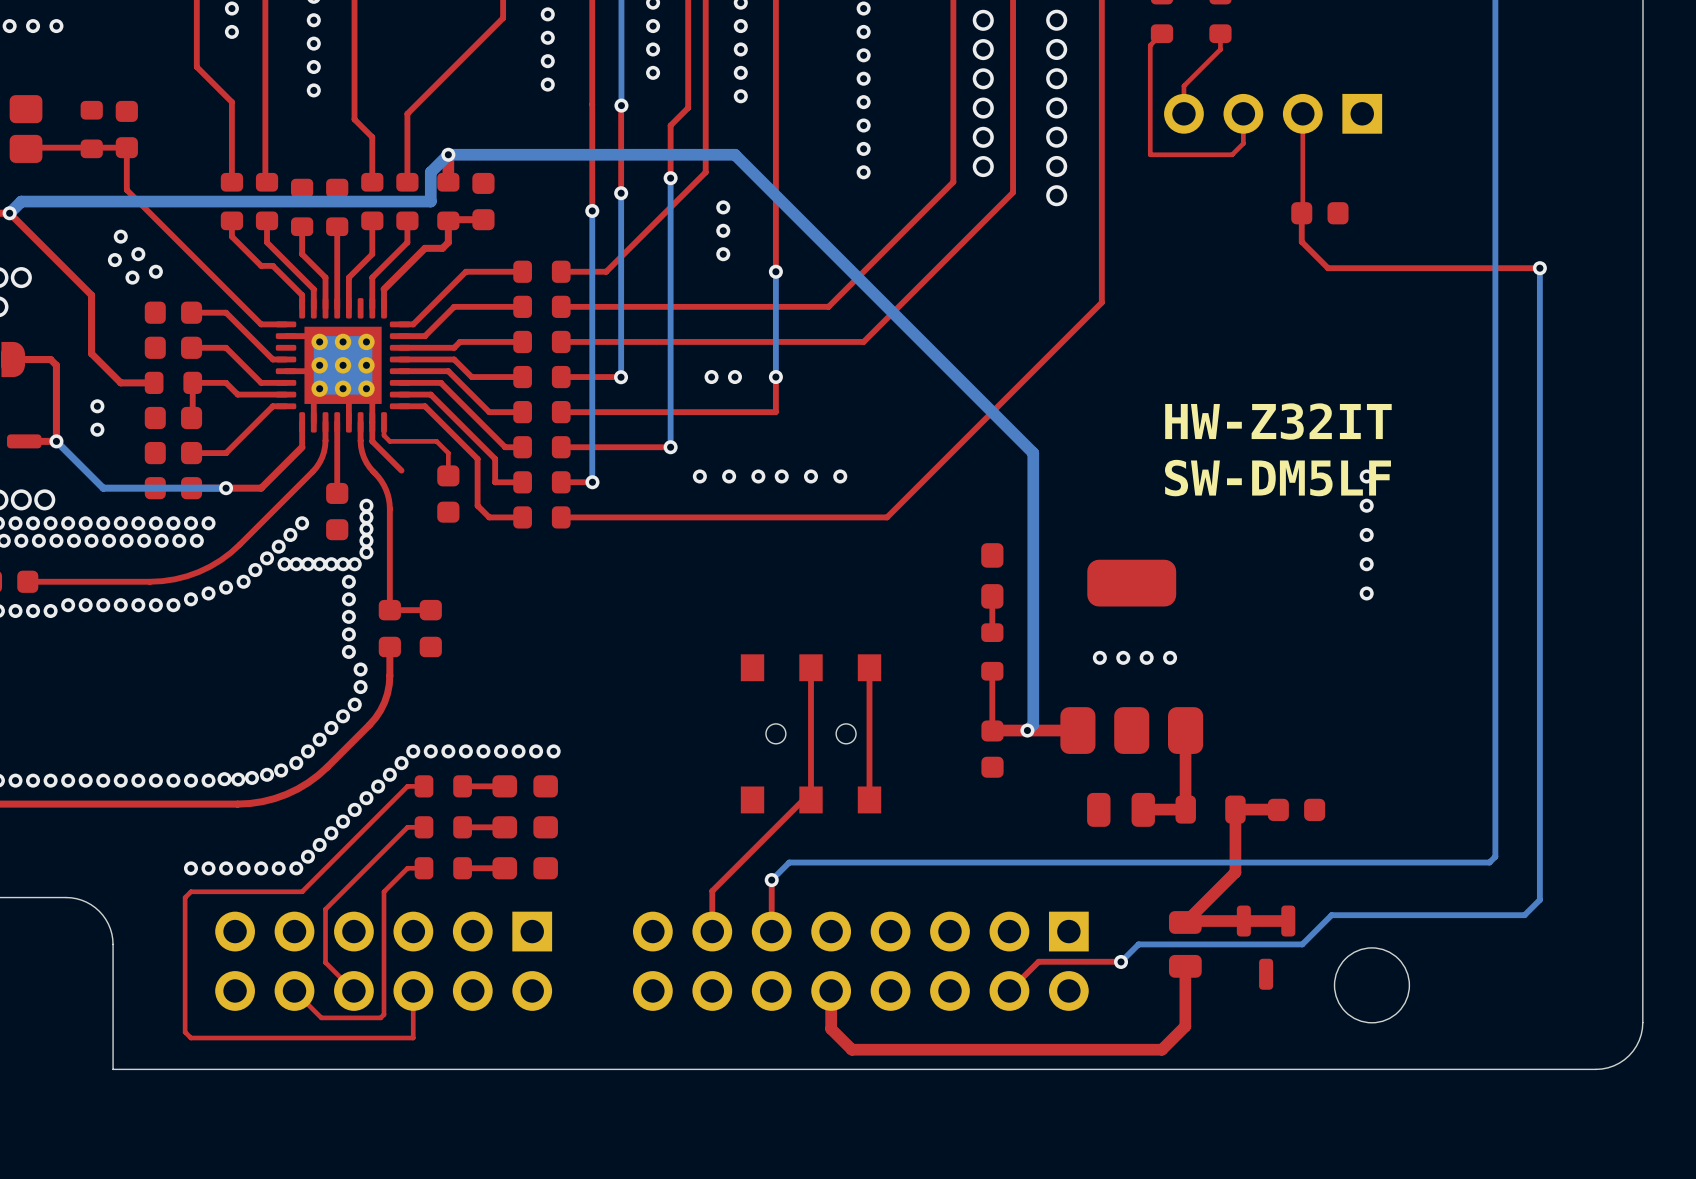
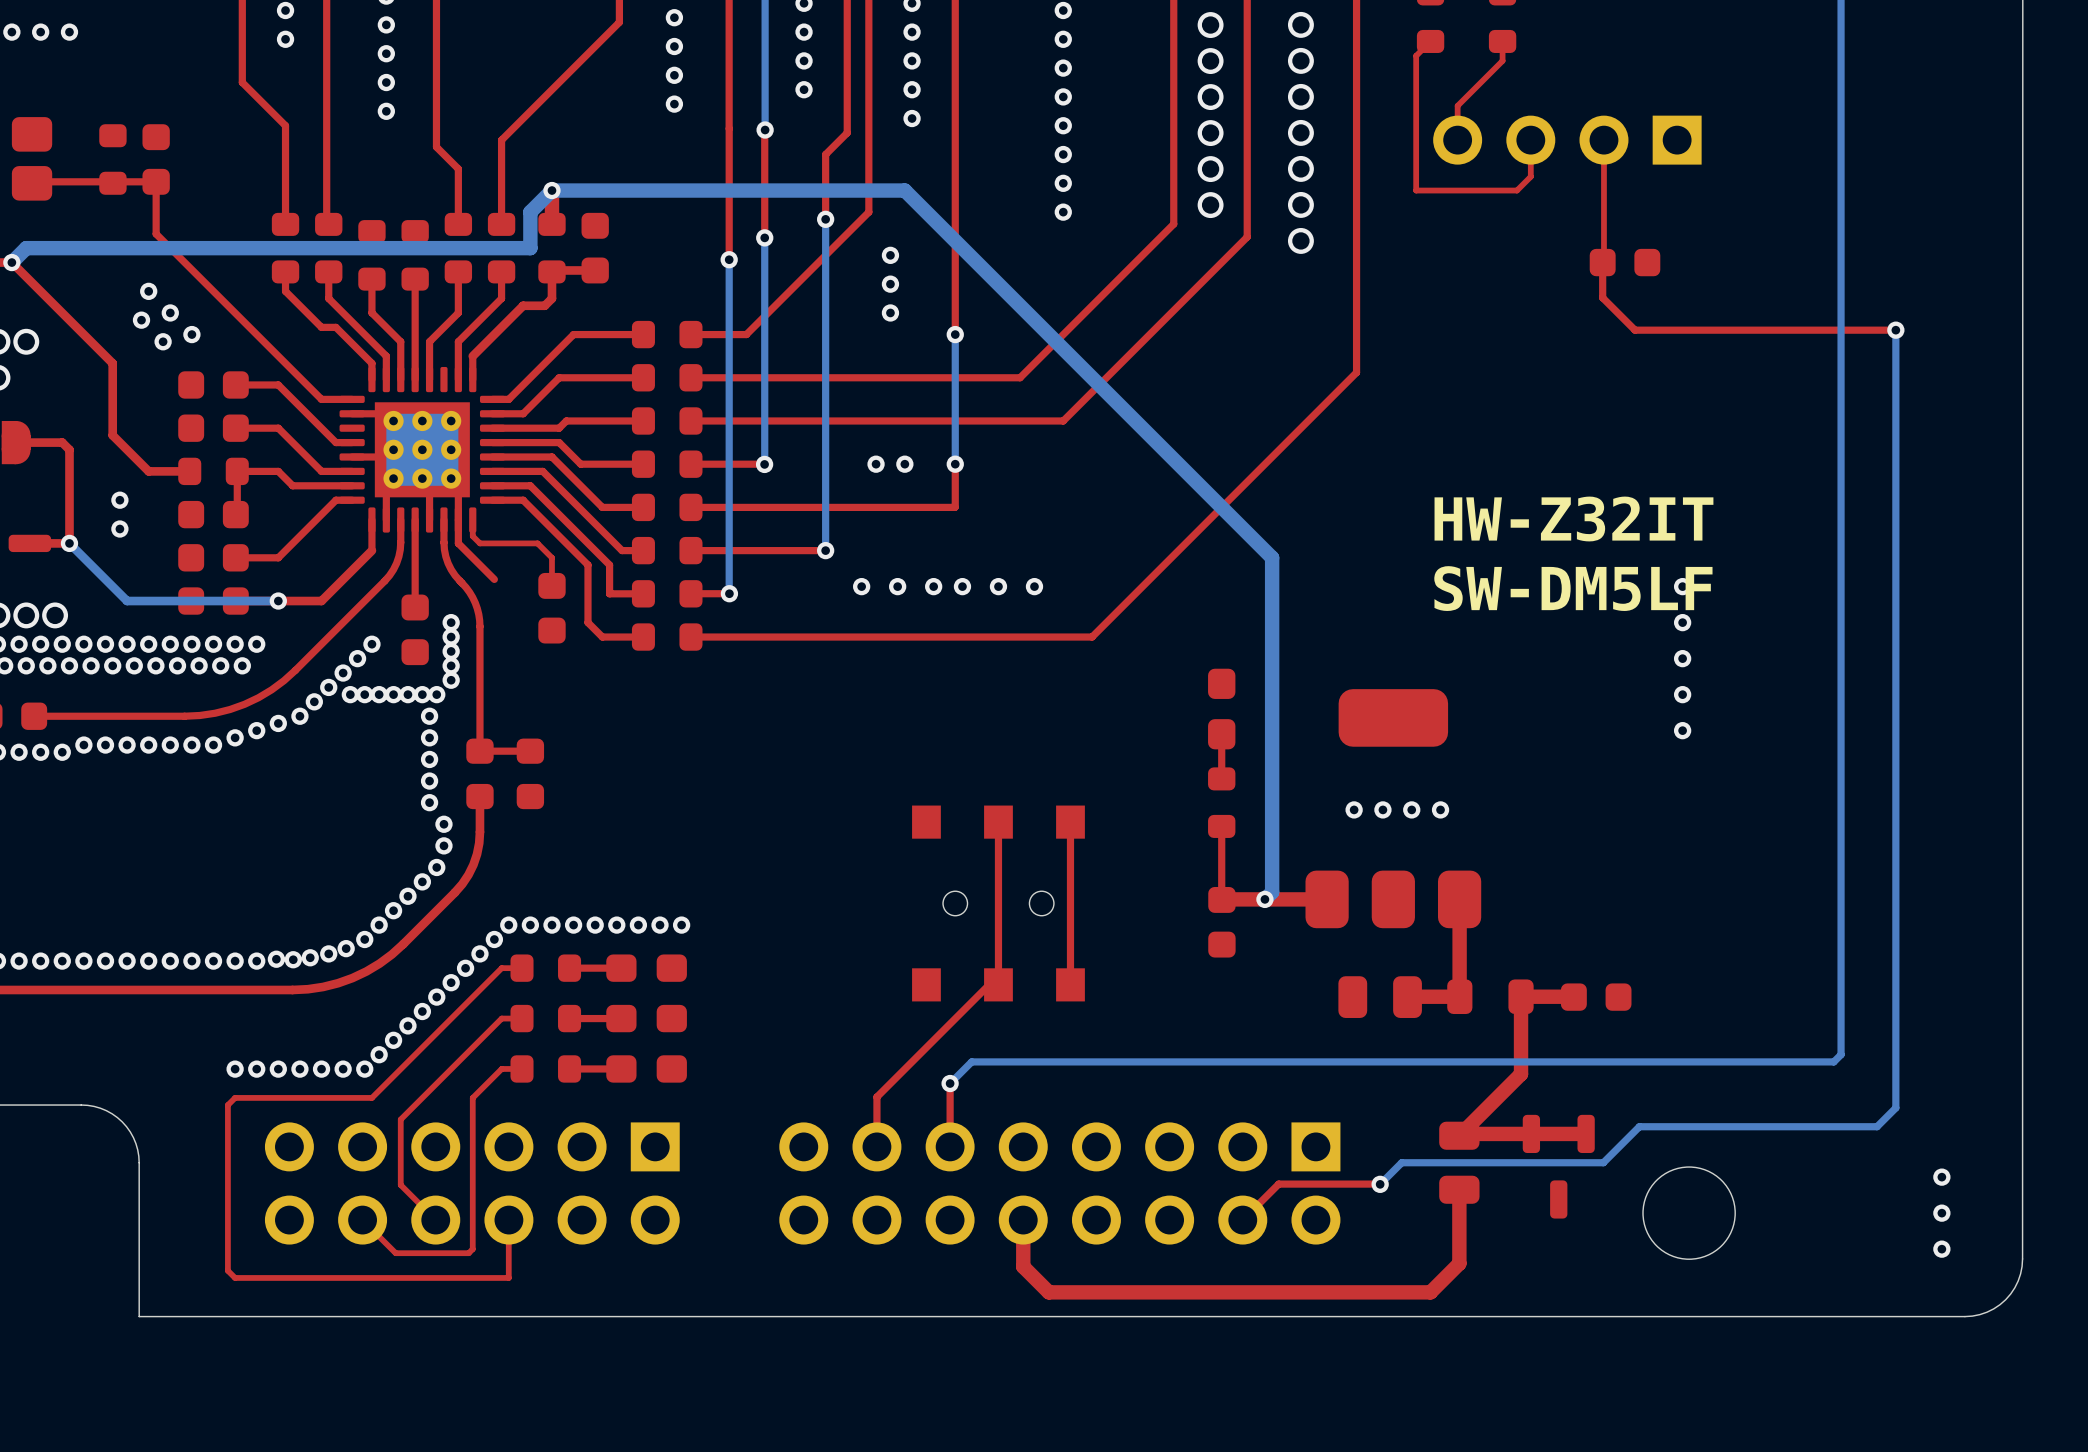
via: none -> (1941, 1177)
via: none -> (1941, 1213)
via: none -> (1941, 1249)

